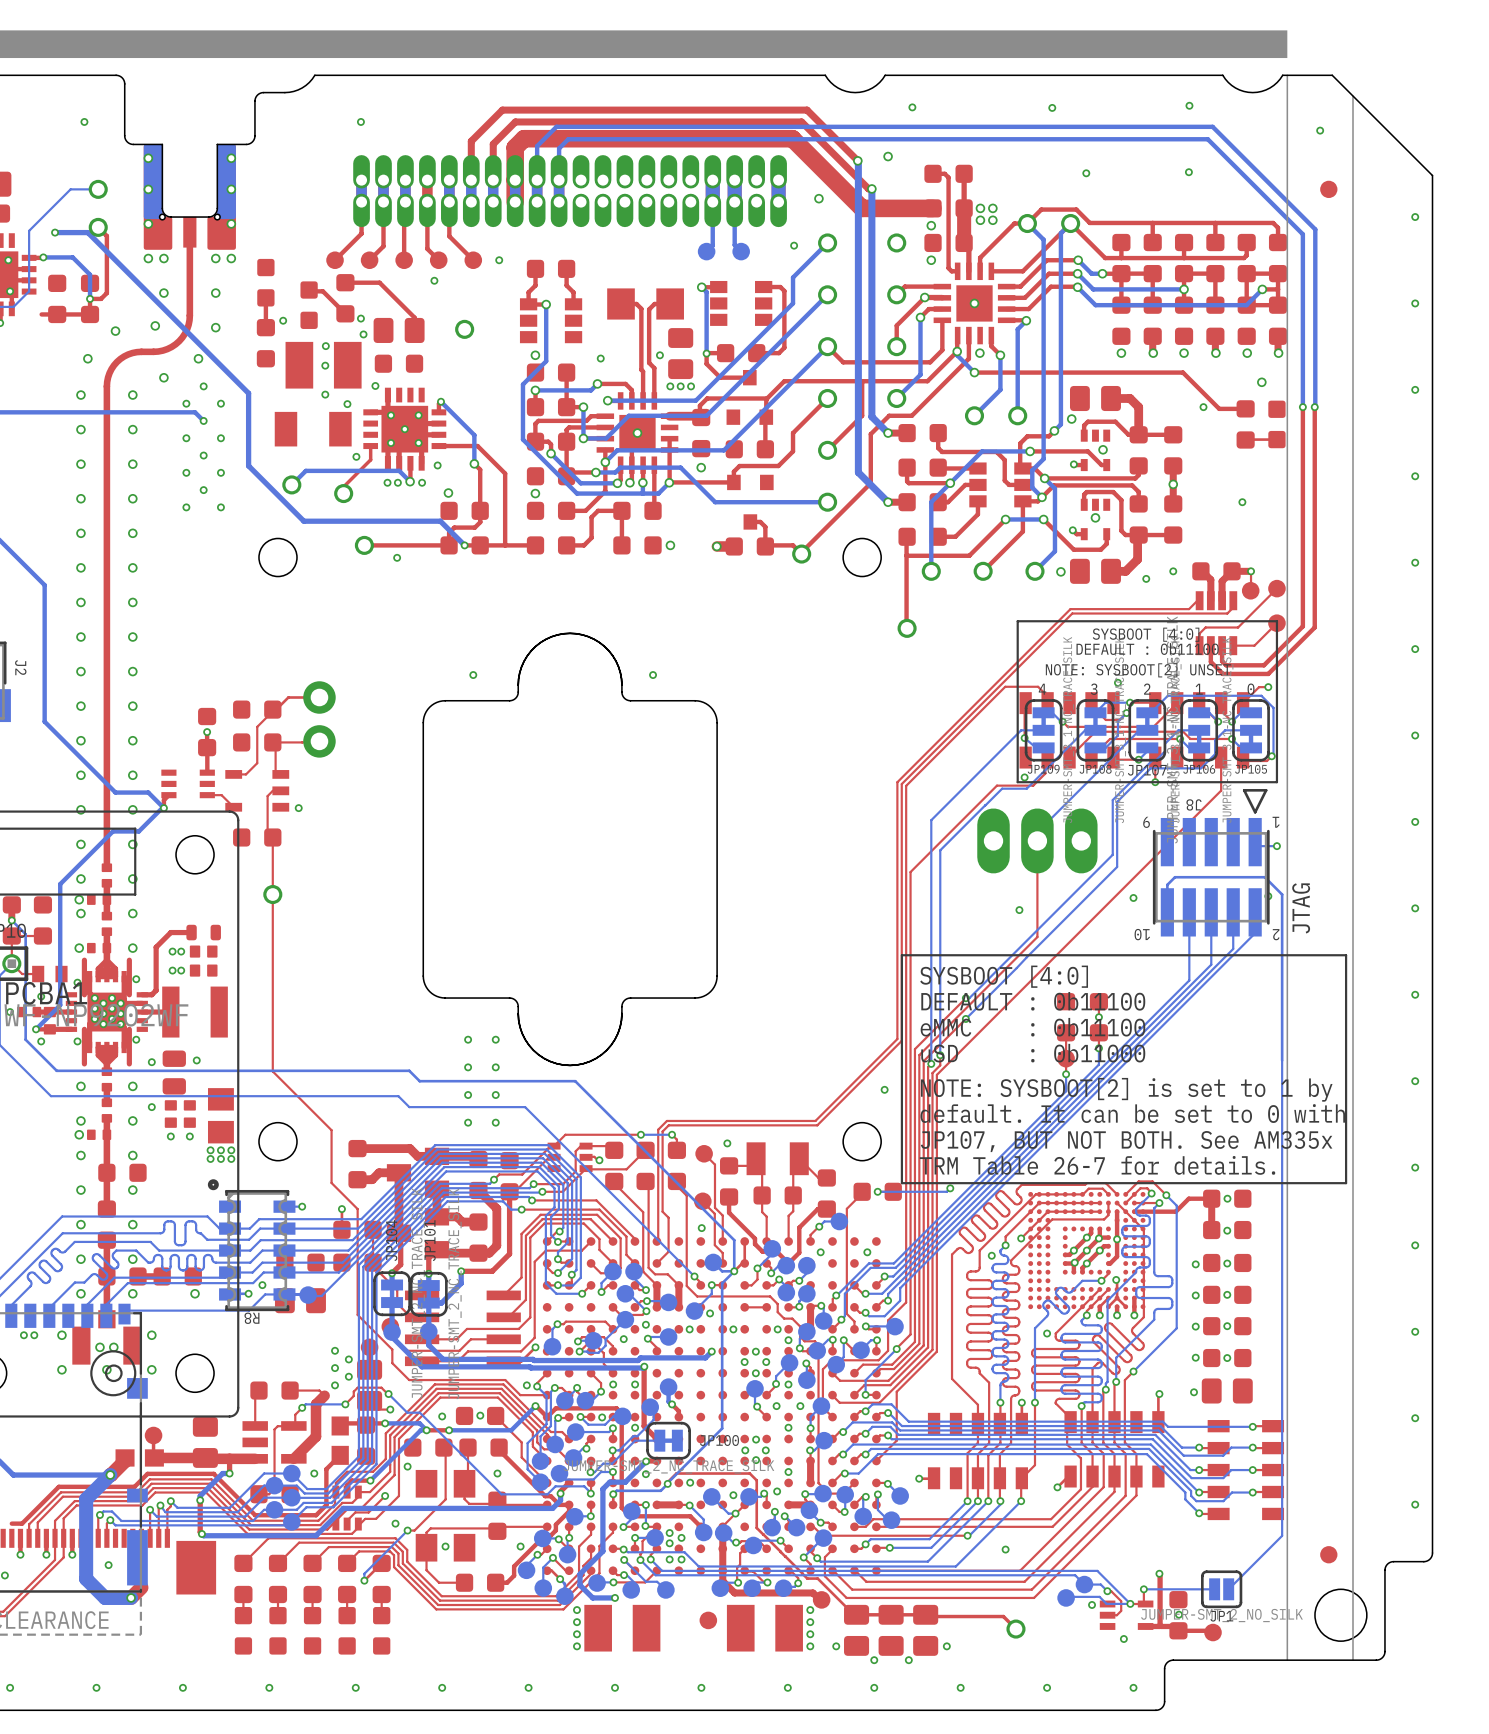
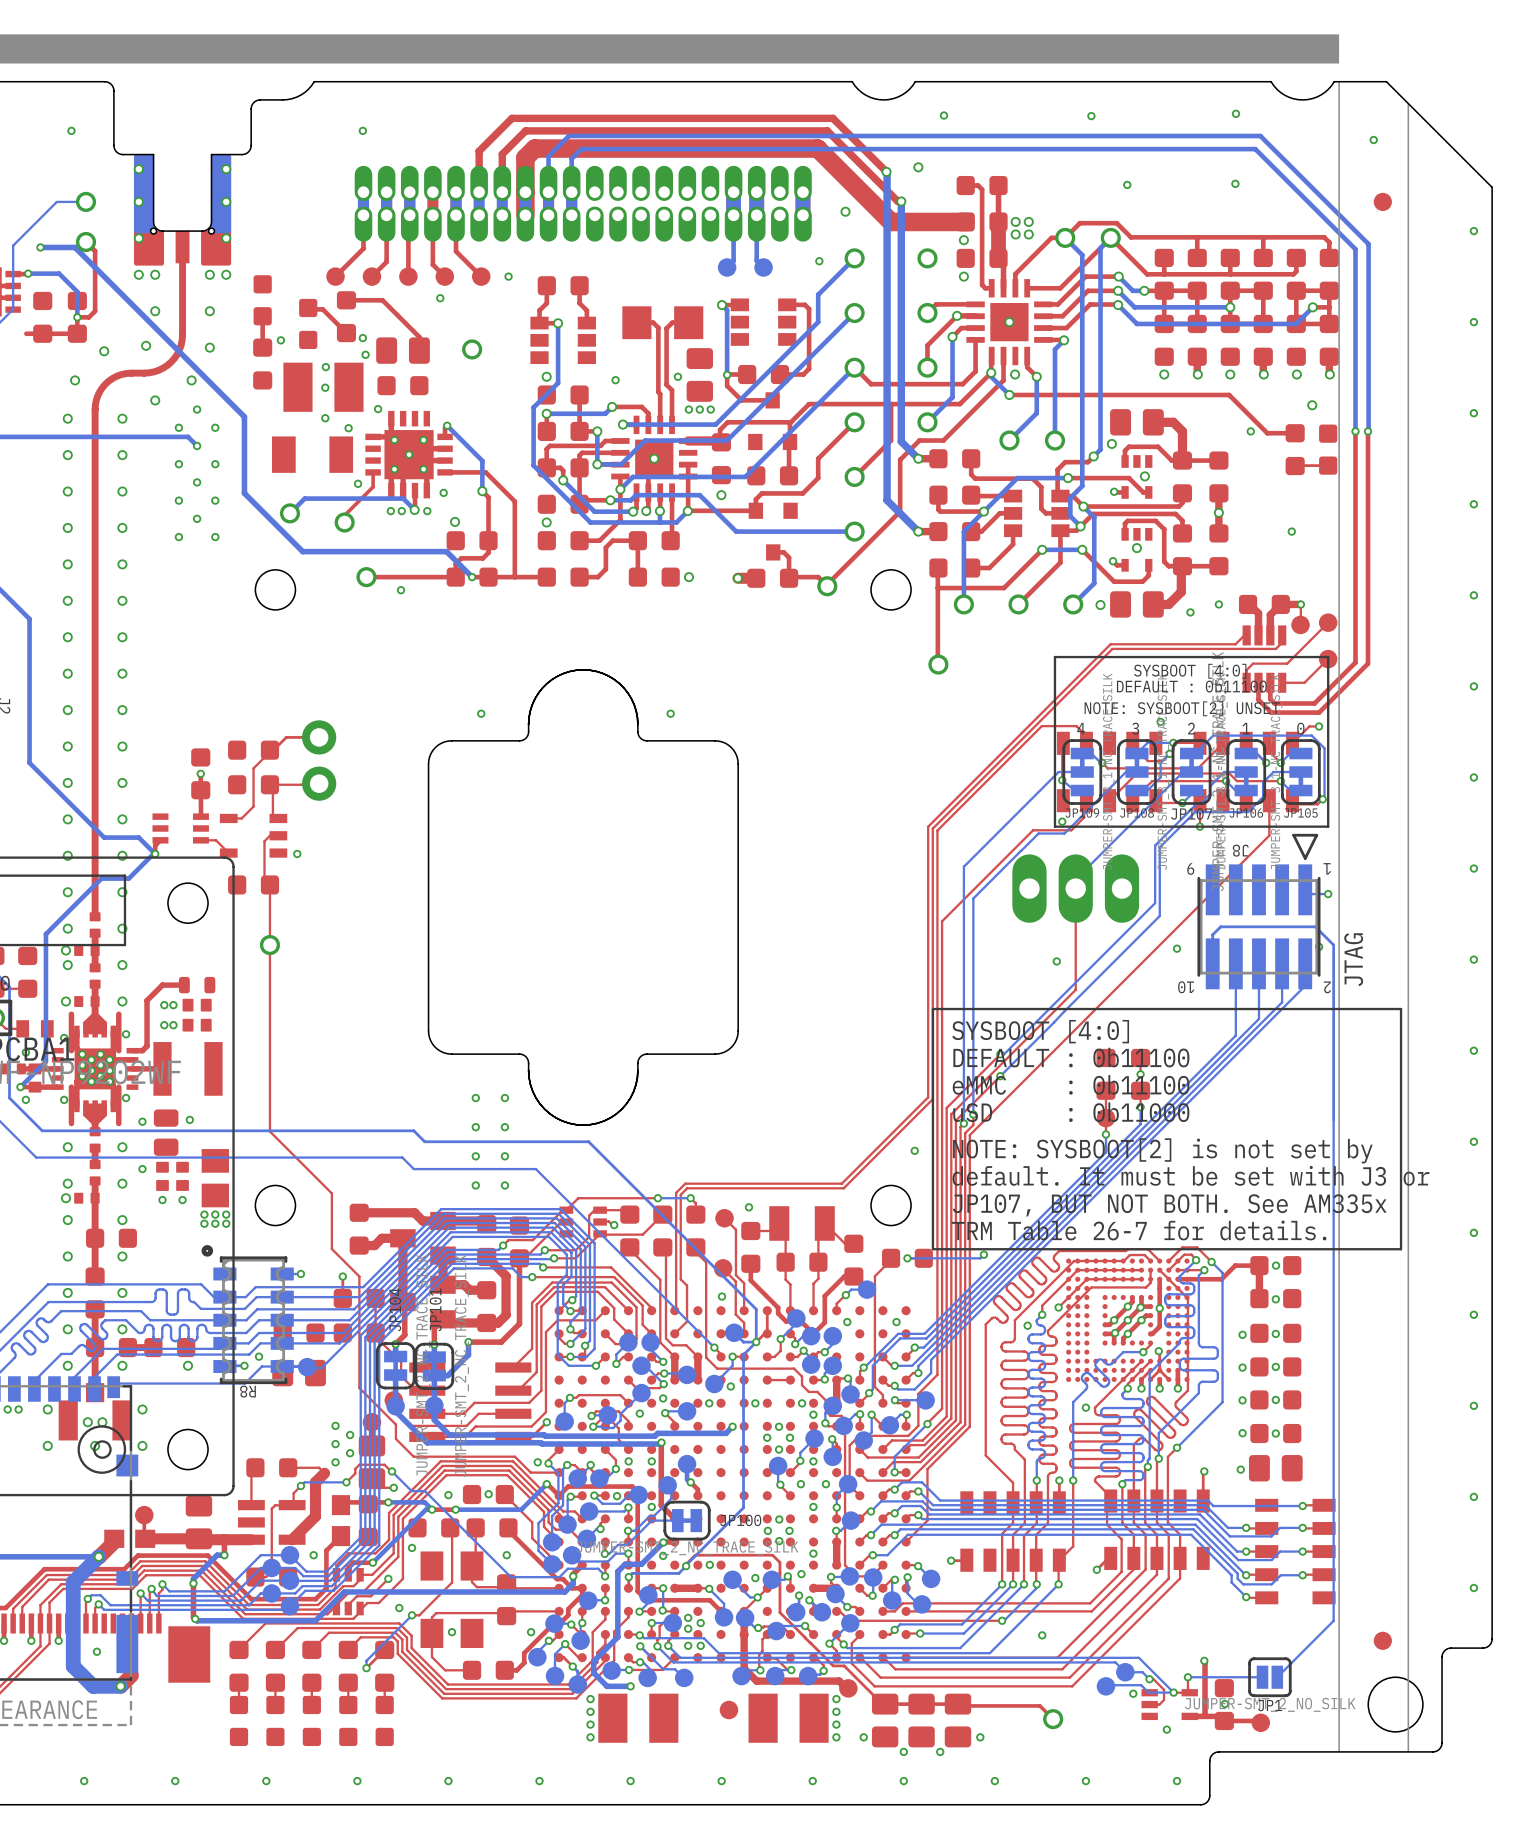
text: NOTE: SYSBOOT[2] is set to 1 by (1126, 1089) -> NOTE: SYSBOOT[2] is not set by (1162, 1150)
text: default. It can be set to 0 with (1132, 1113) -> default. It must be set with J3 or (1190, 1175)

